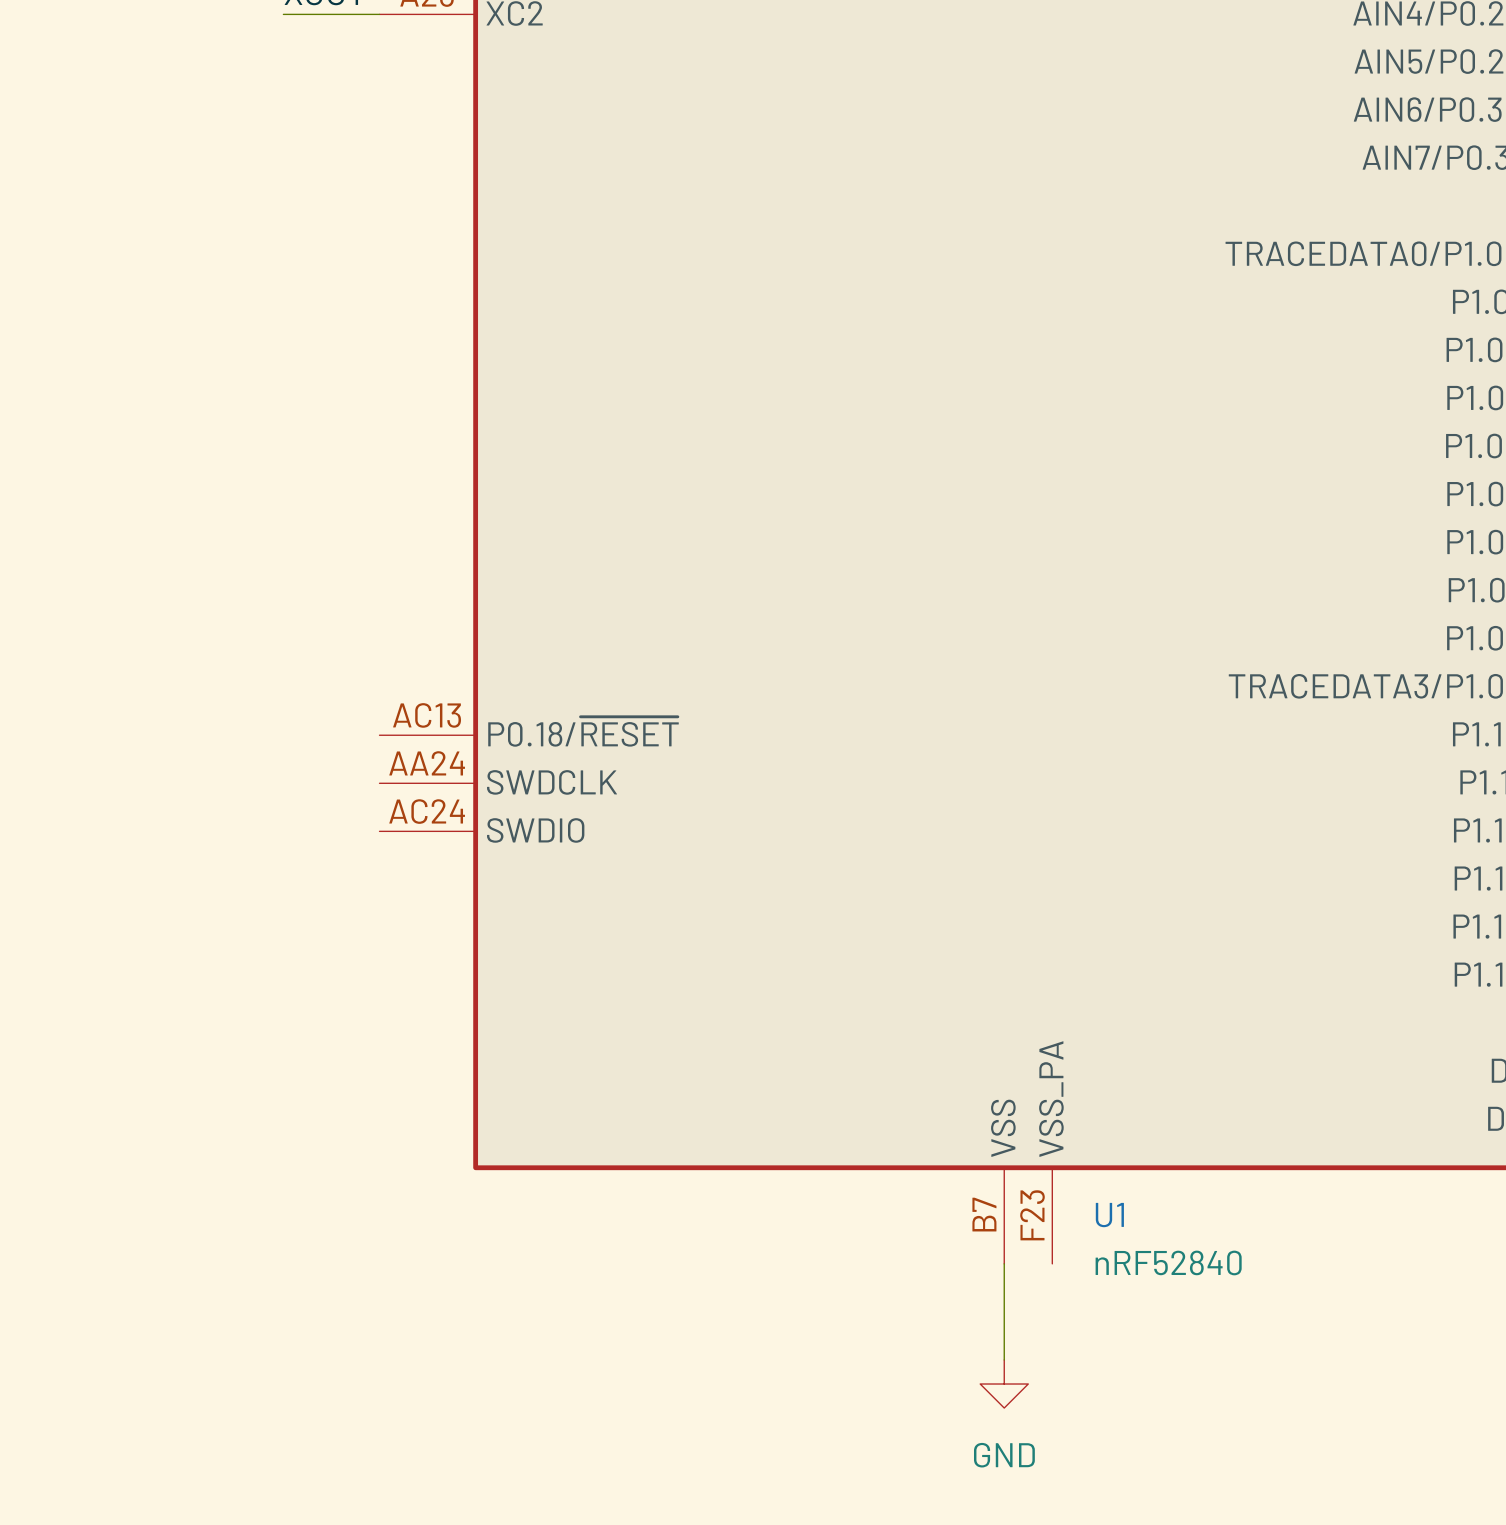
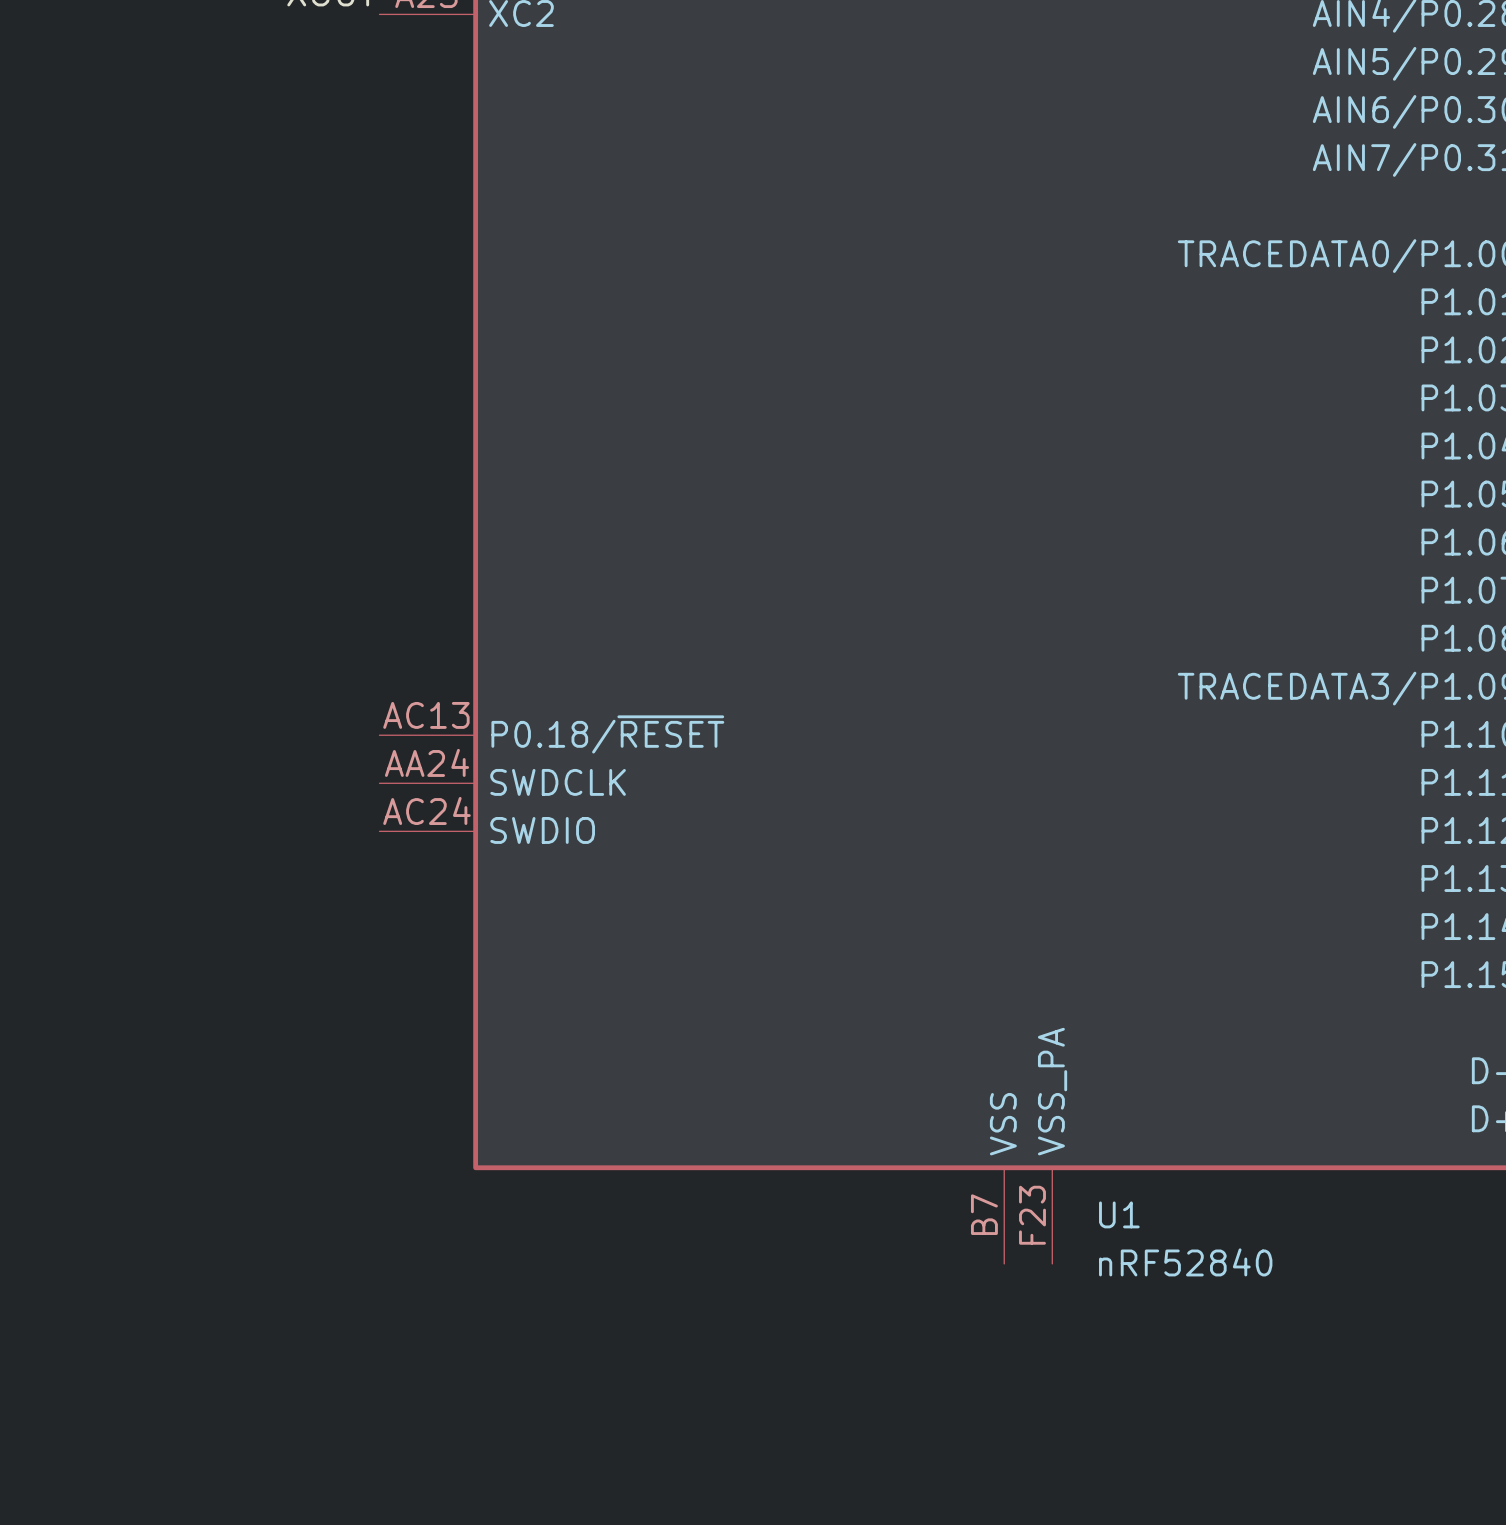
wire: (283, 14) (379, 14) -> none
wire: (1004, 1263) (1004, 1359) -> none
power symbol: GND (1004, 1384) -> none

